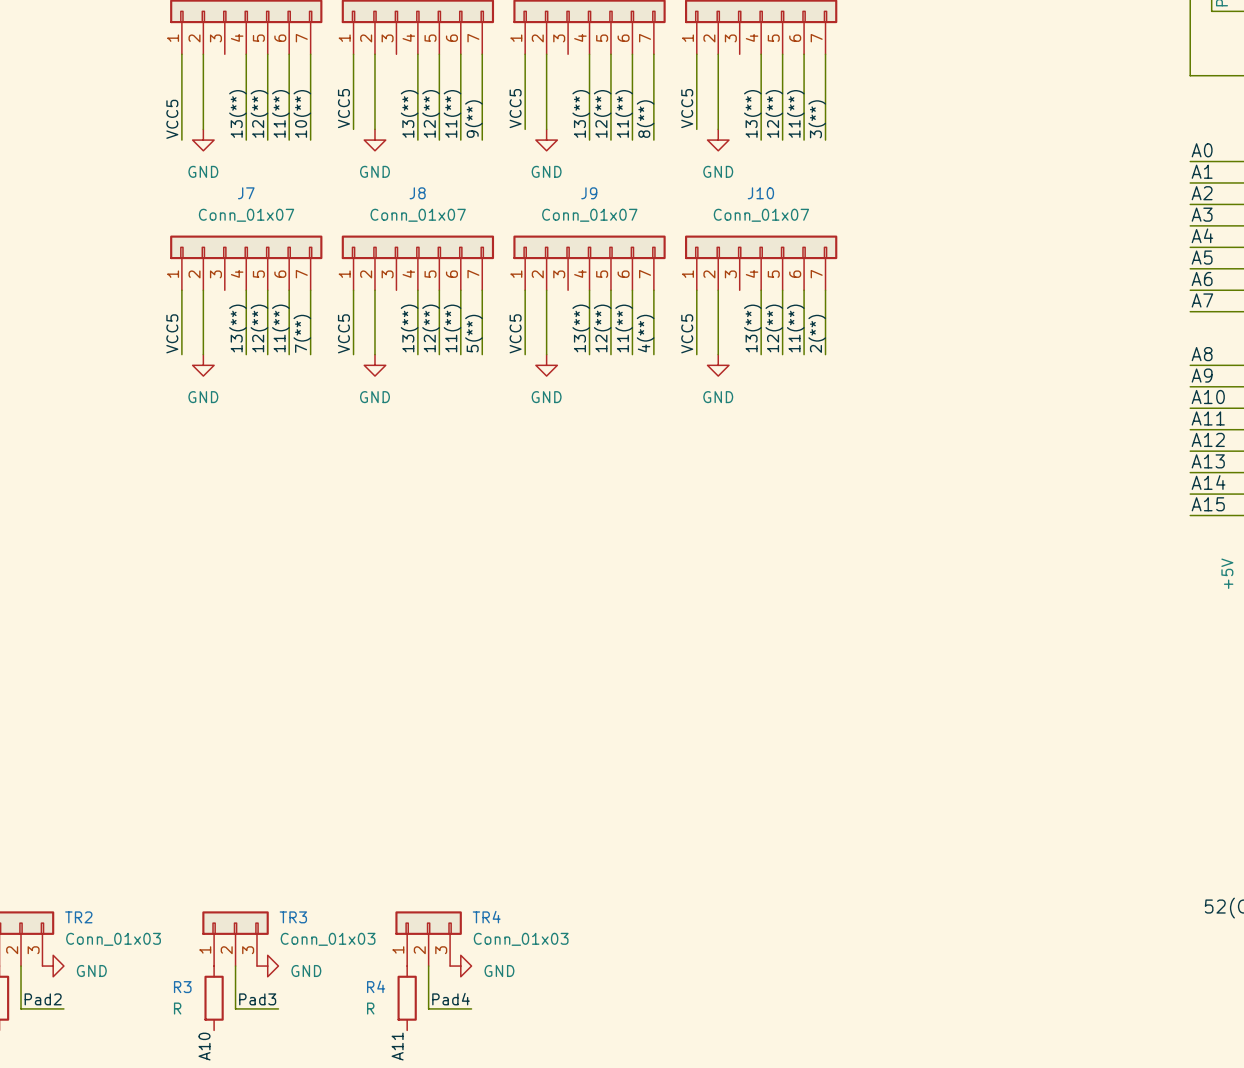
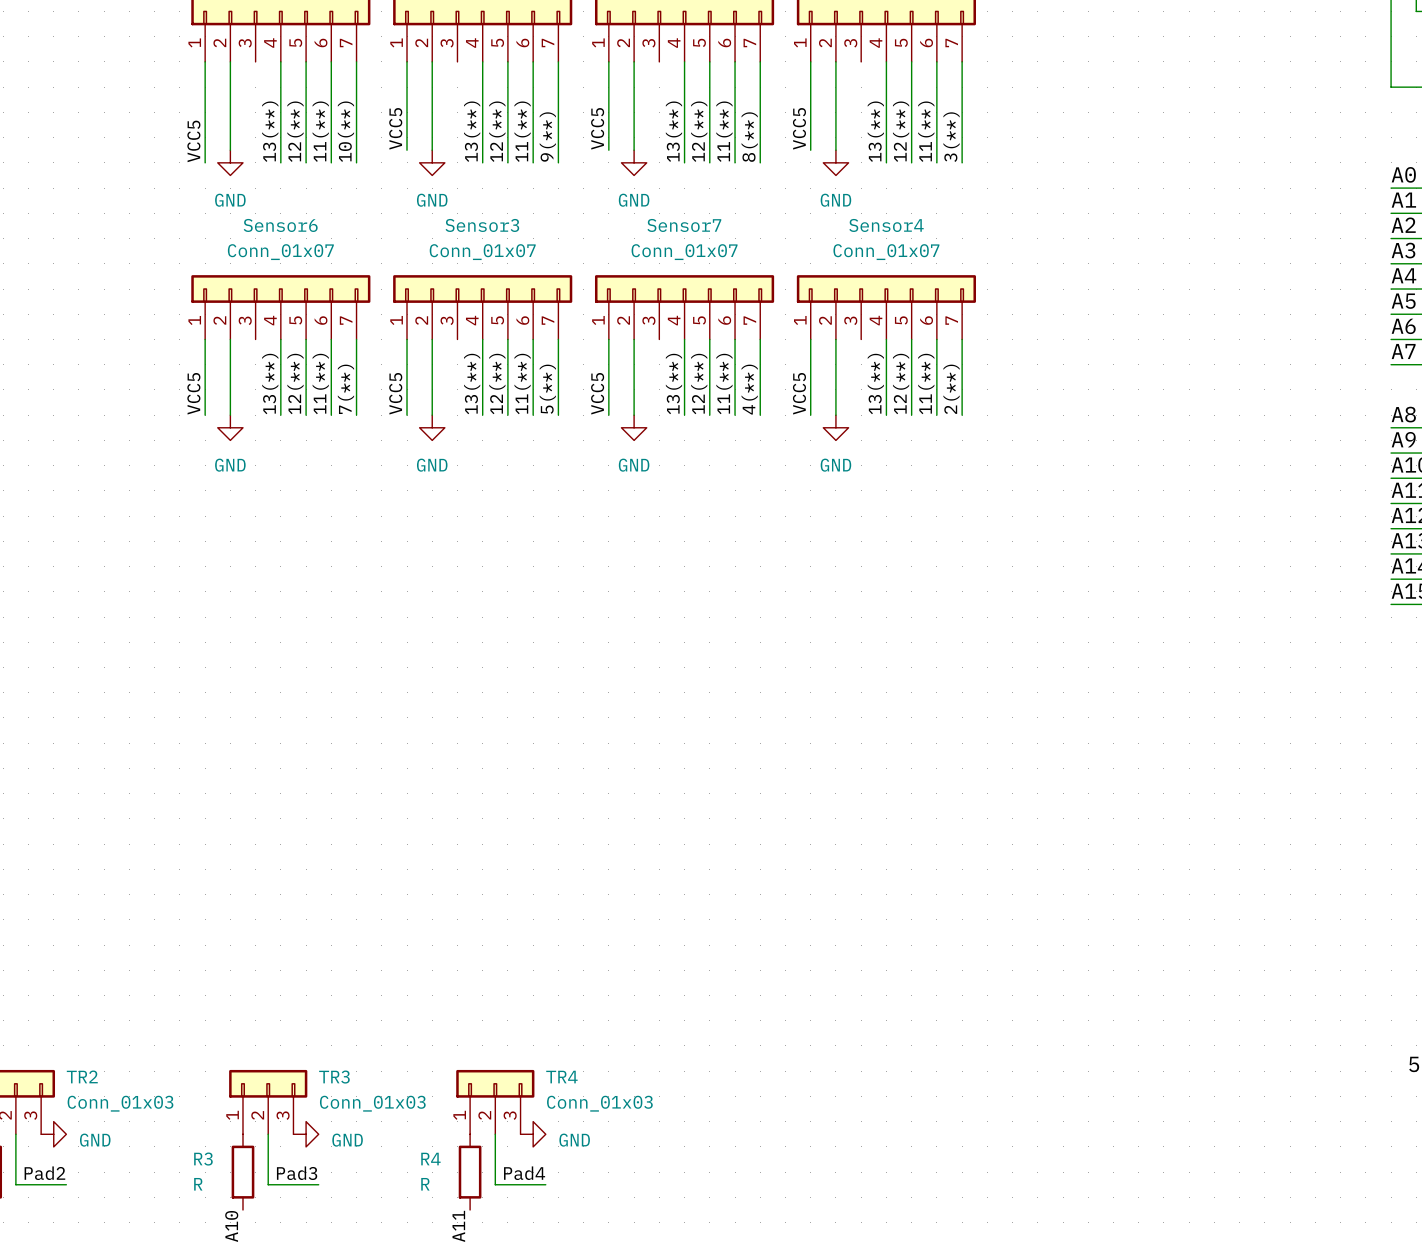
J7 name: J7 (246, 193) -> Sensor6 (280, 225)
J8 name: J8 (417, 193) -> Sensor3 (482, 225)
J9 name: J9 (589, 193) -> Sensor7 (684, 225)
J10 name: J10 (760, 193) -> Sensor4 (886, 225)

